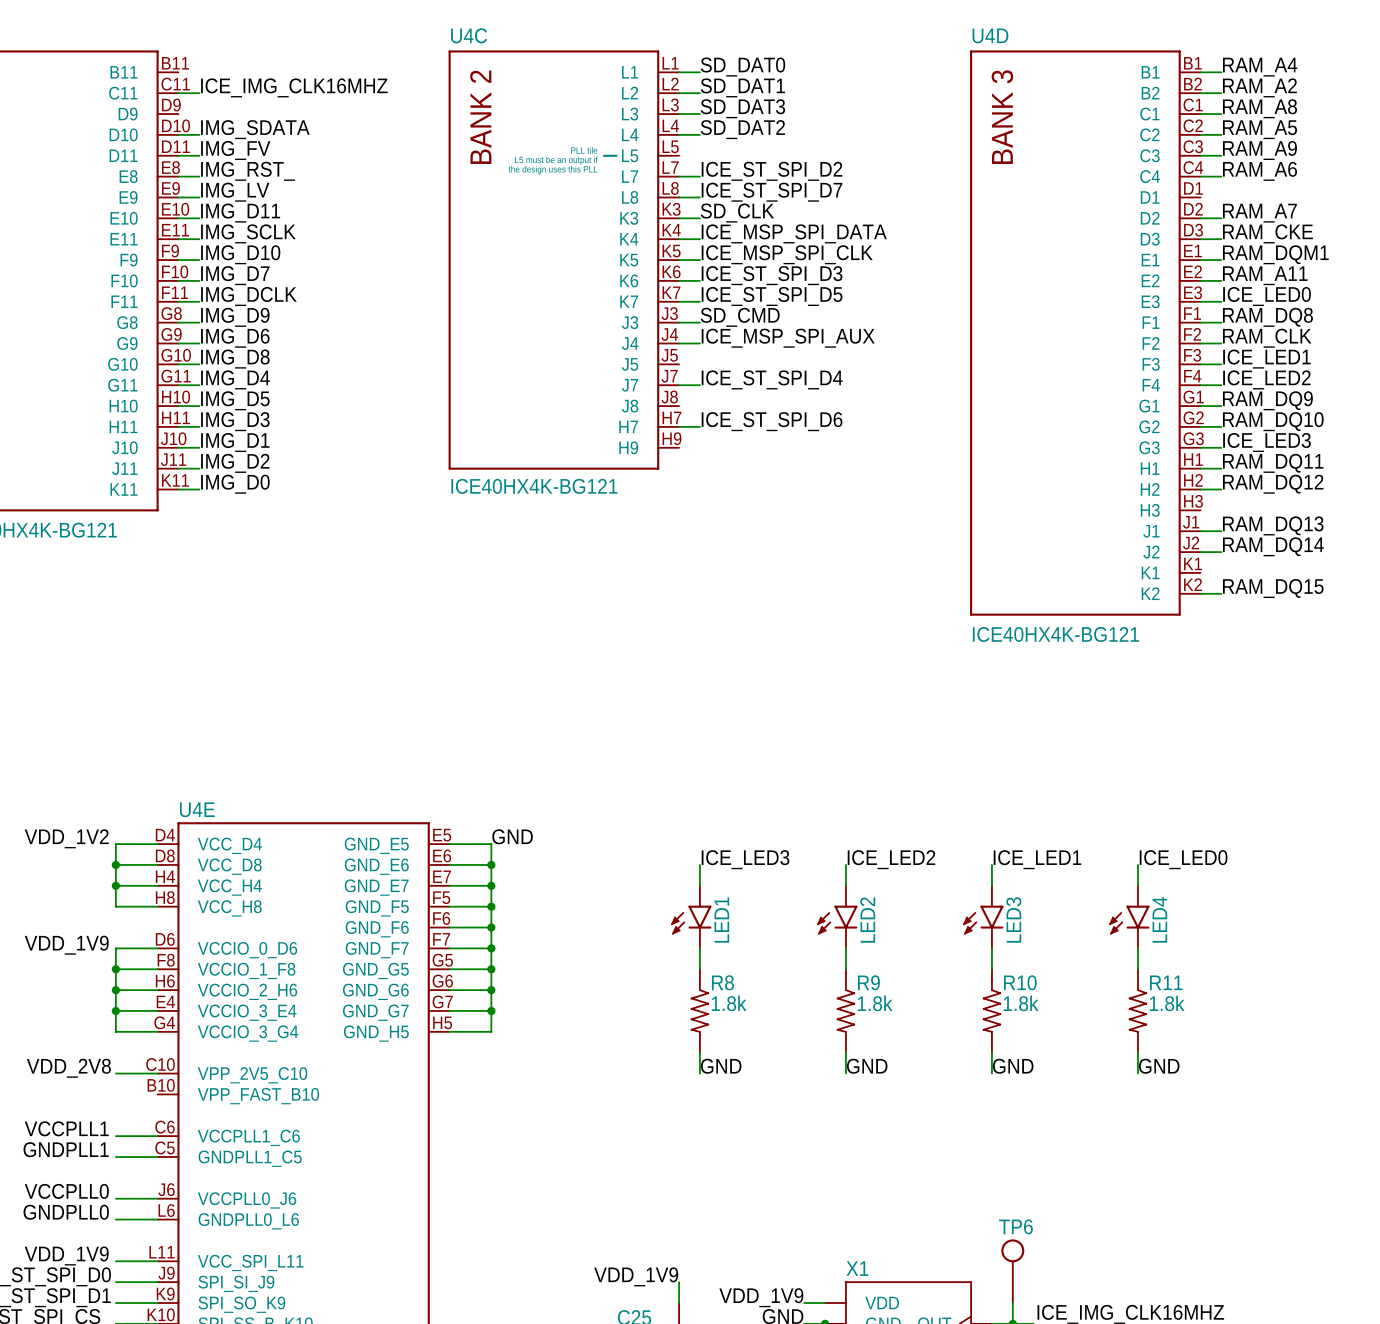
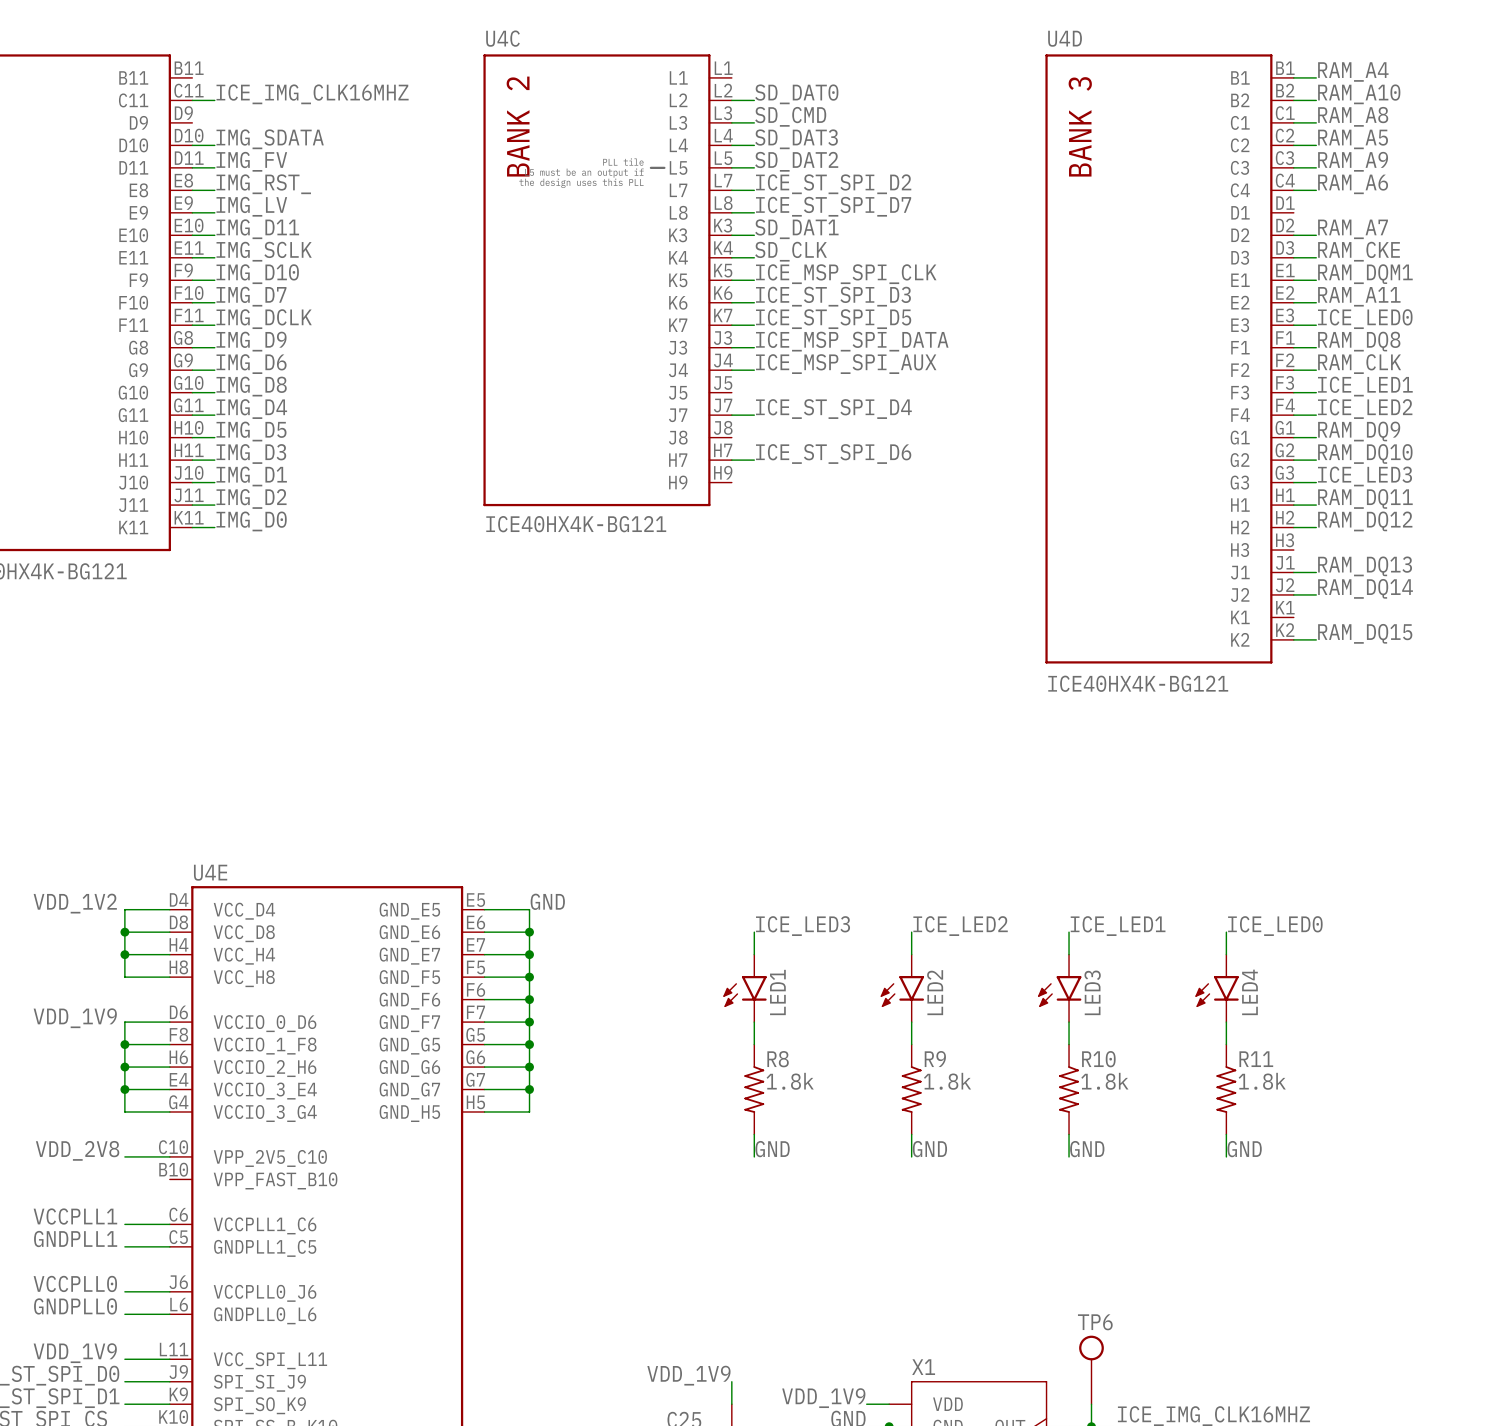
label: SD_DAT0 (742, 67) -> none
wire: (679, 72) (699, 72) -> (731, 167) (754, 167)
label: SD_DAT1 (742, 87) -> SD_DAT0 (796, 94)
label: RAM_A2 (1259, 87) -> RAM_A10 (1359, 94)
label: SD_DAT3 (742, 108) -> SD_CMD (790, 116)
label: SD_DAT2 (742, 129) -> SD_DAT3 (796, 139)
label: none -> SD_DAT2 (796, 161)
label: SD_CLK (737, 213) -> SD_DAT1 (796, 229)
label: ICE_MSP_SPI_DATA (794, 233) -> SD_CLK (791, 251)
label: SD_CMD (740, 317) -> ICE_MSP_SPI_DATA (852, 341)

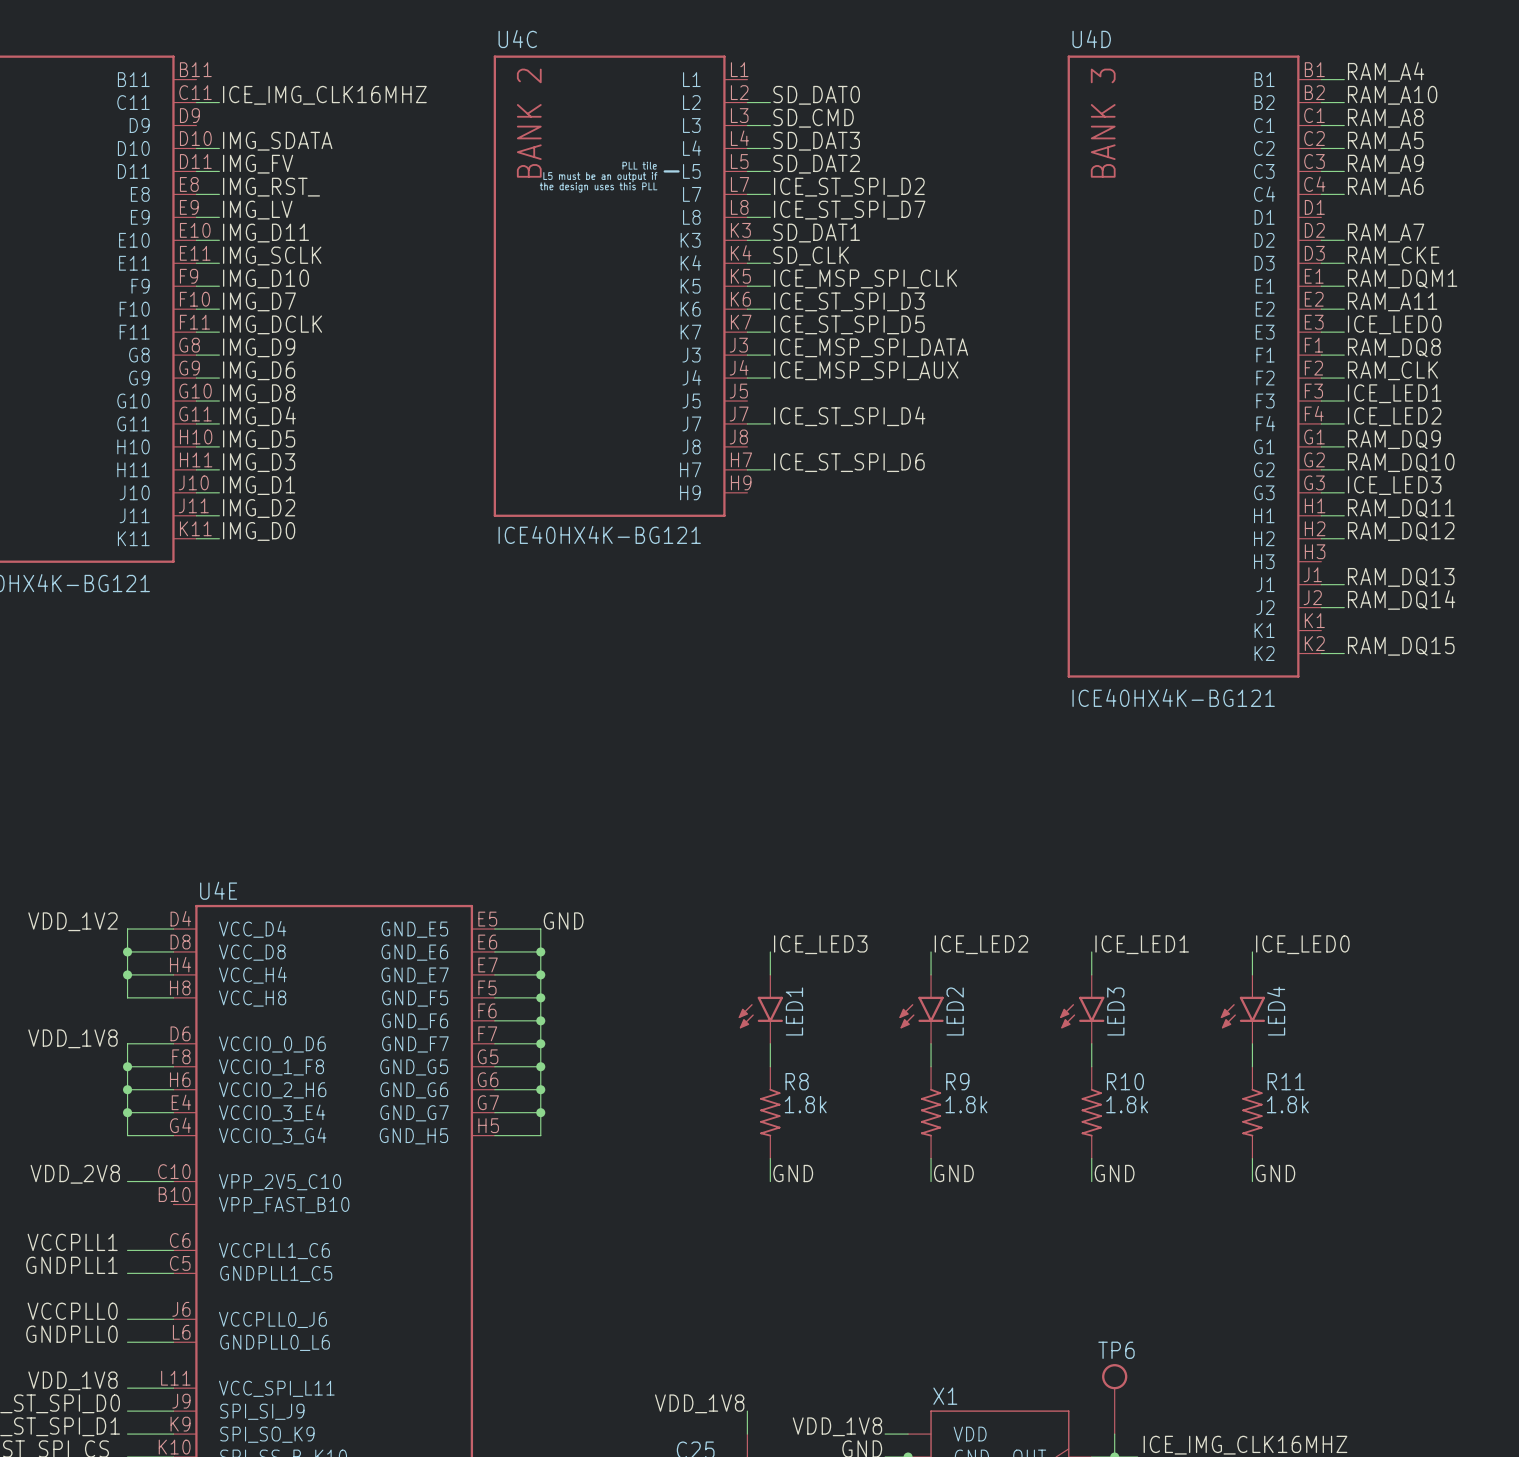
label: VDD_1V9 (75, 1018) -> VDD_1V8 (72, 1038)
label: VDD_1V9 (75, 1353) -> VDD_1V8 (72, 1380)
label: VDD_1V9 (688, 1375) -> VDD_1V8 (699, 1403)
label: VDD_1V9 (823, 1398) -> VDD_1V8 (837, 1426)

